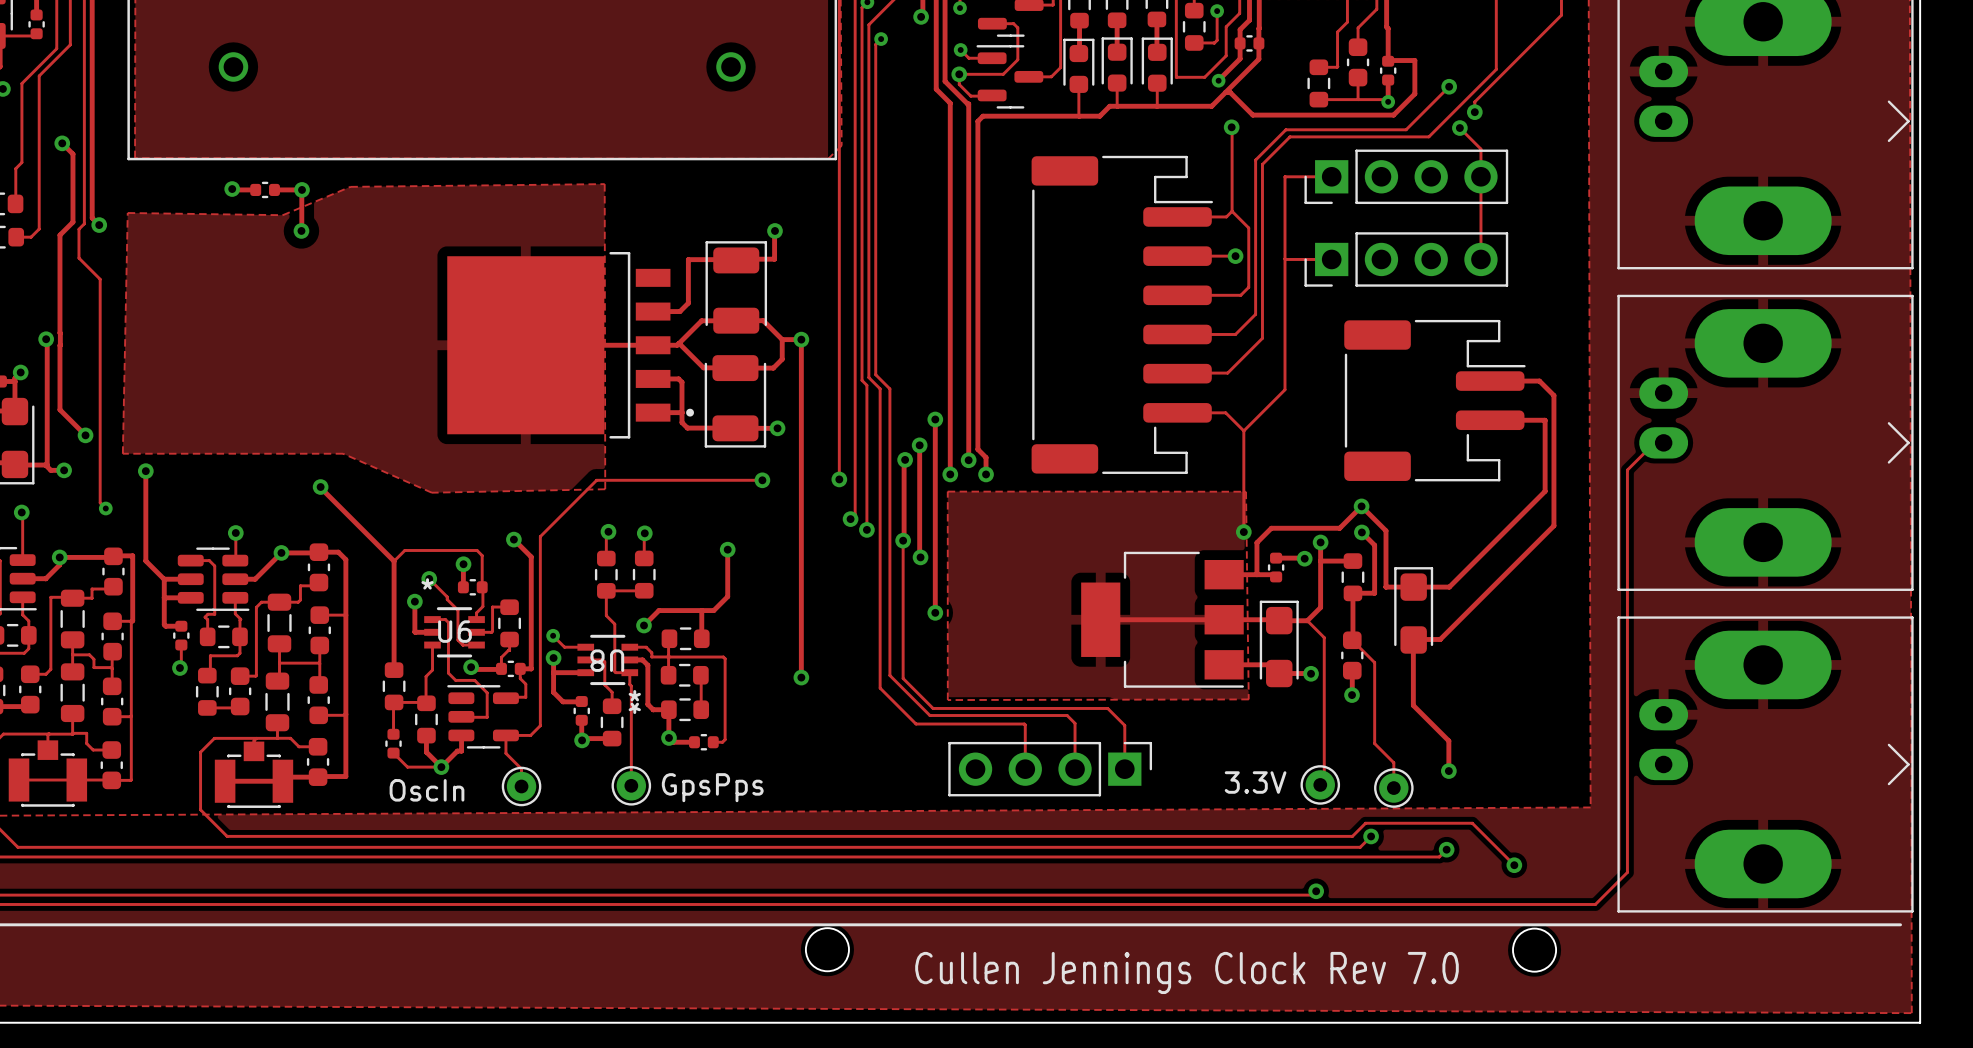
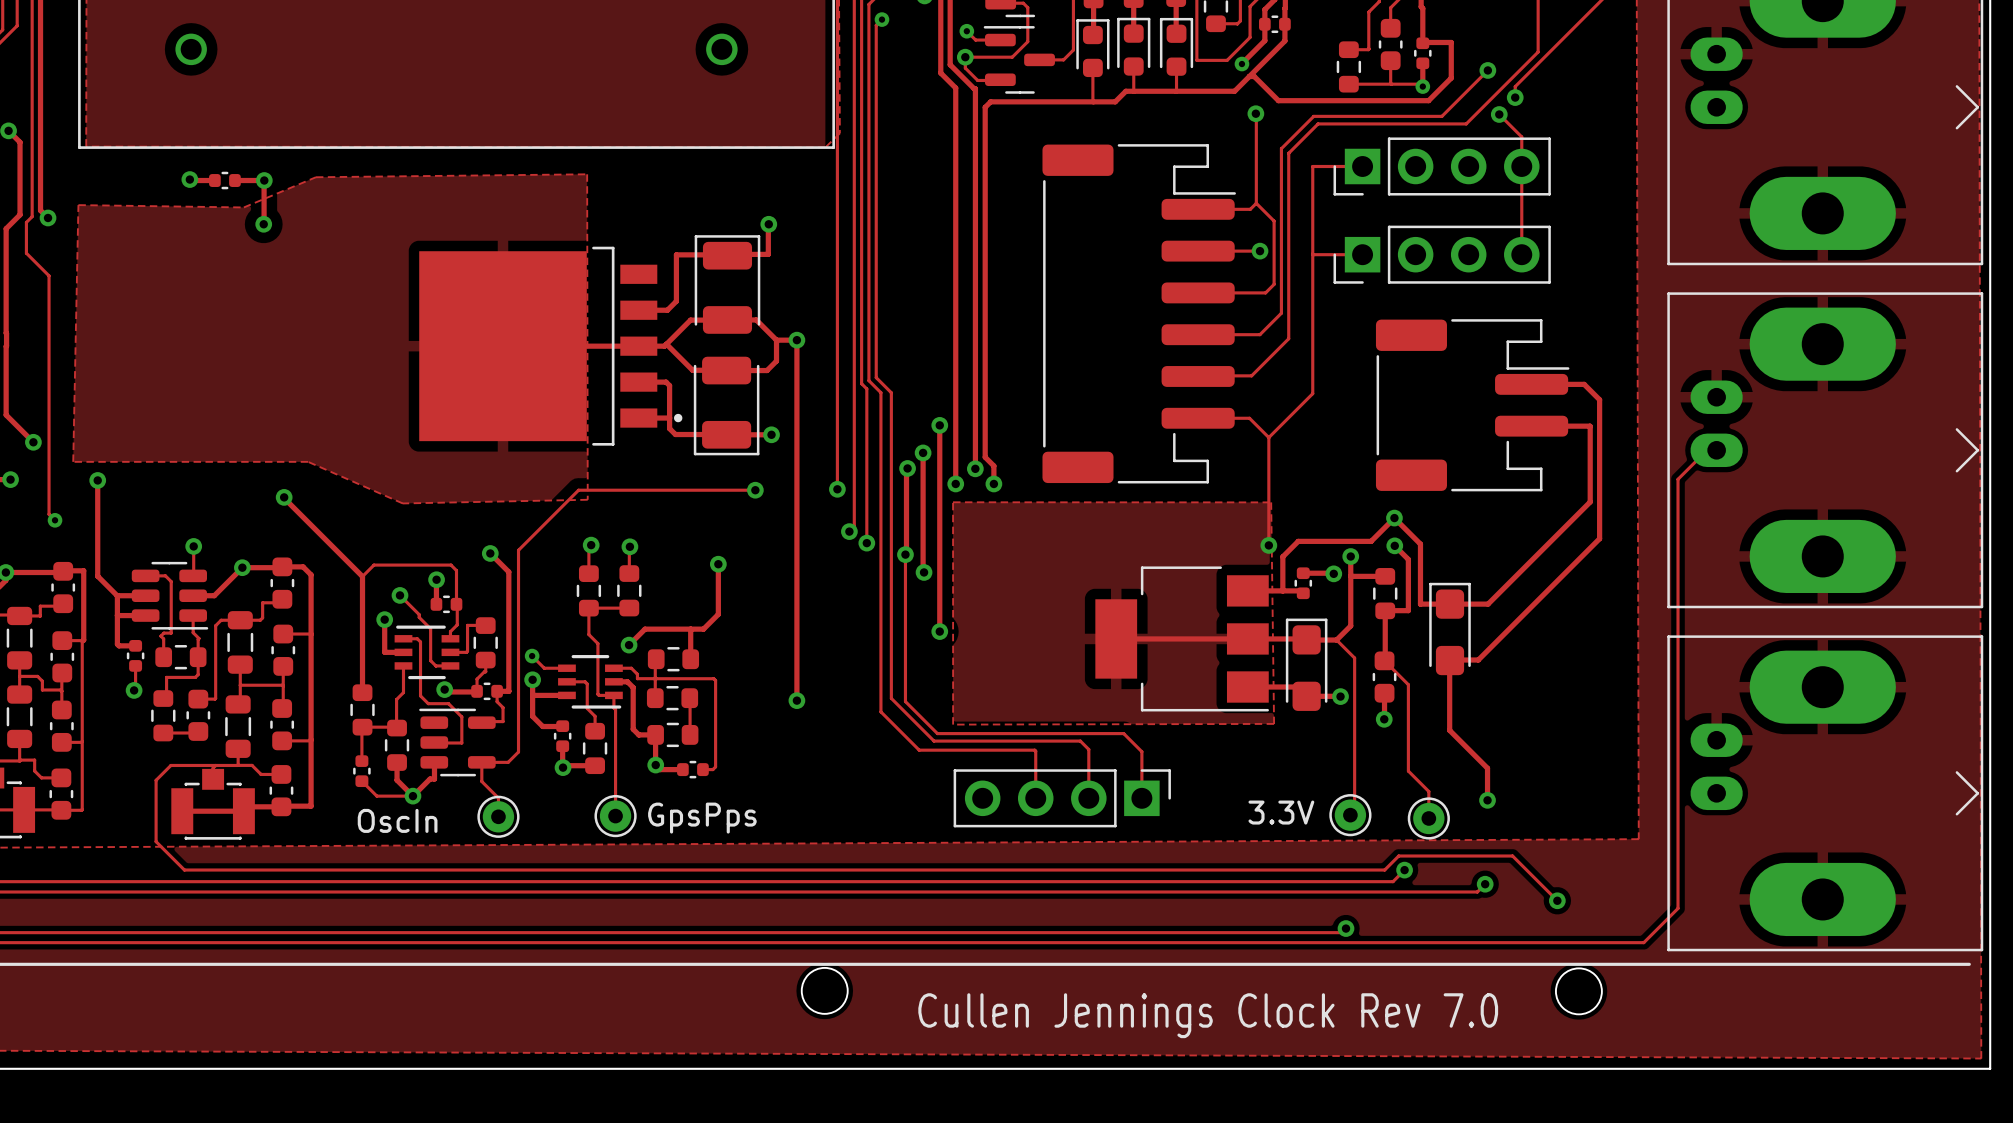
U6: (454, 632) -> none
part: none -> (426, 652)
U8: (607, 659) -> none
part: none -> (590, 681)

